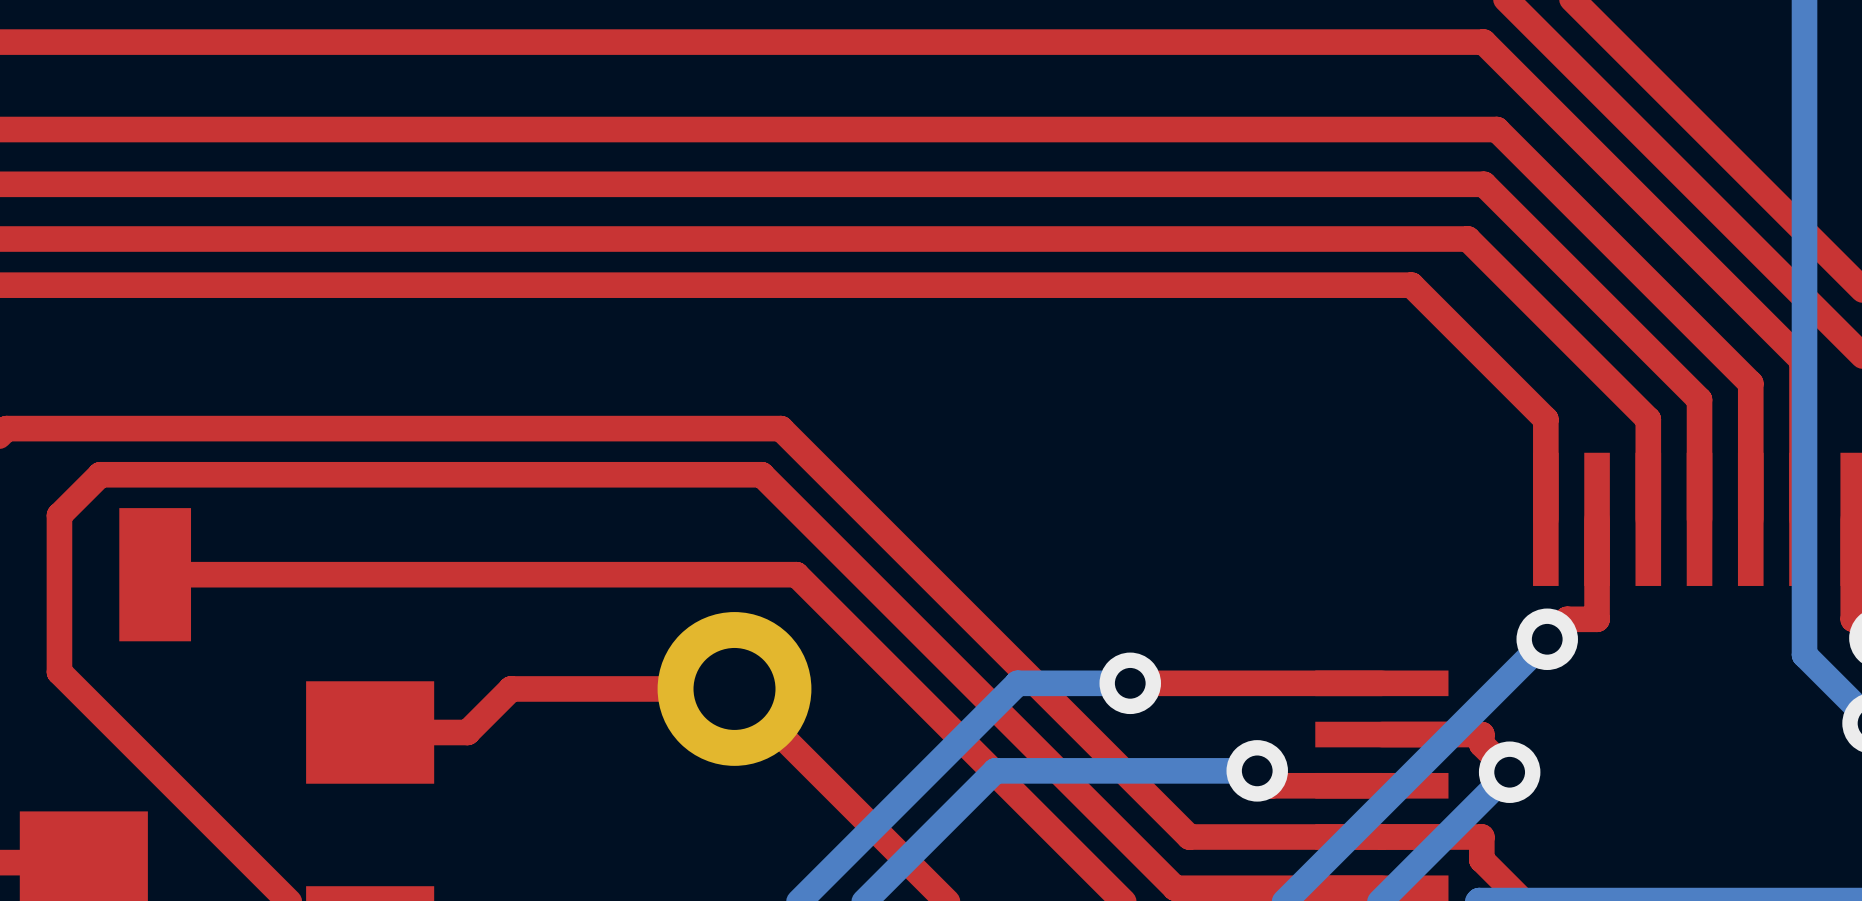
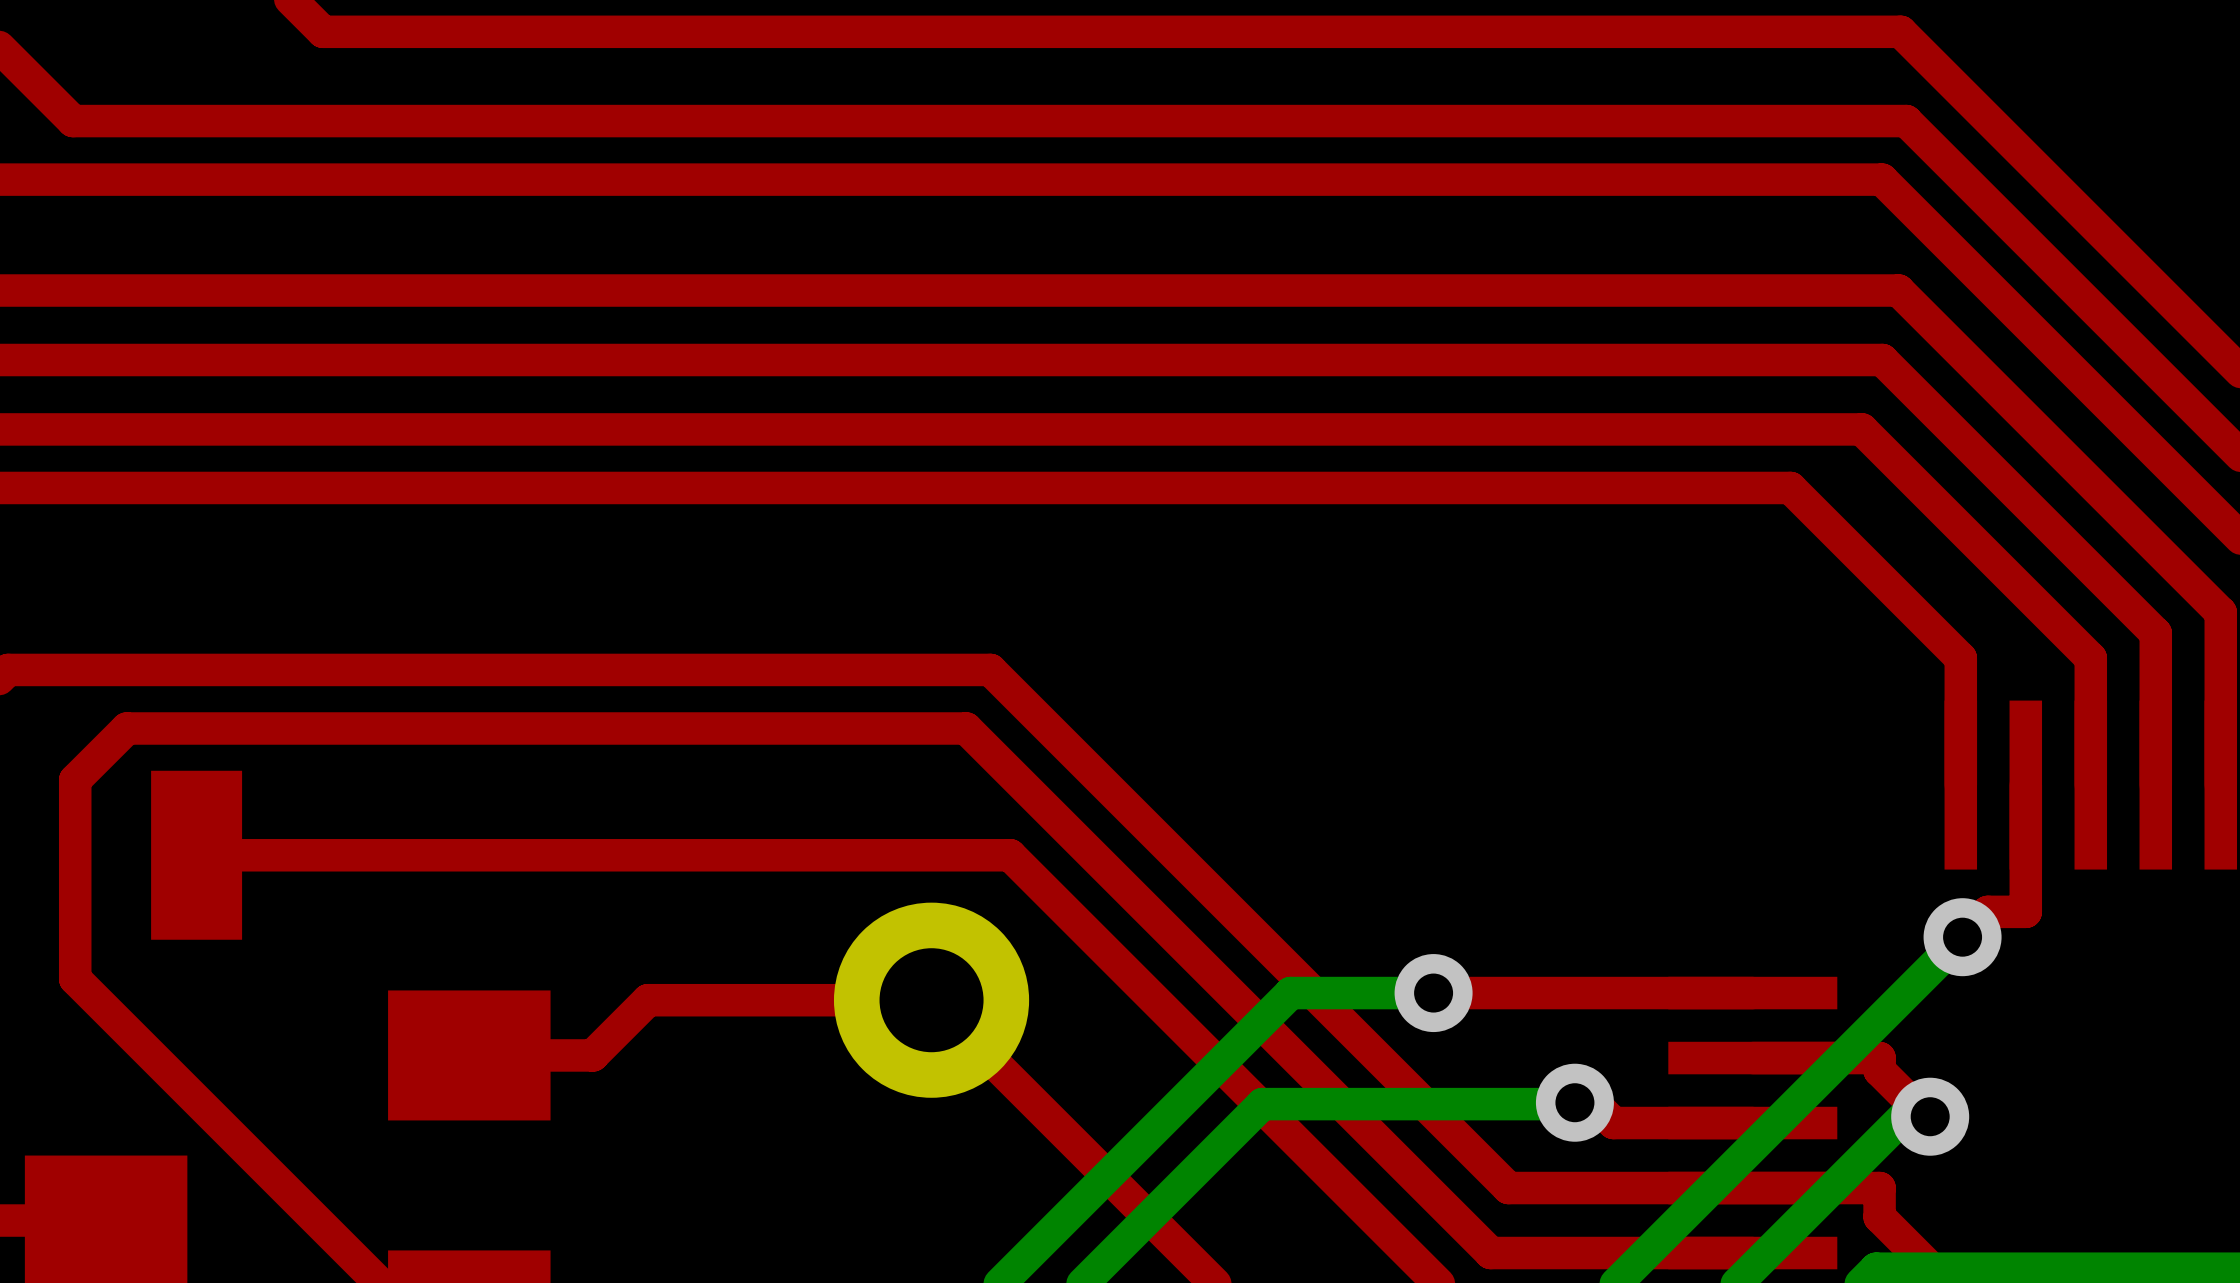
via position: (1257, 770) -> (1574, 1102)
via position: (1509, 772) -> (1930, 1116)

